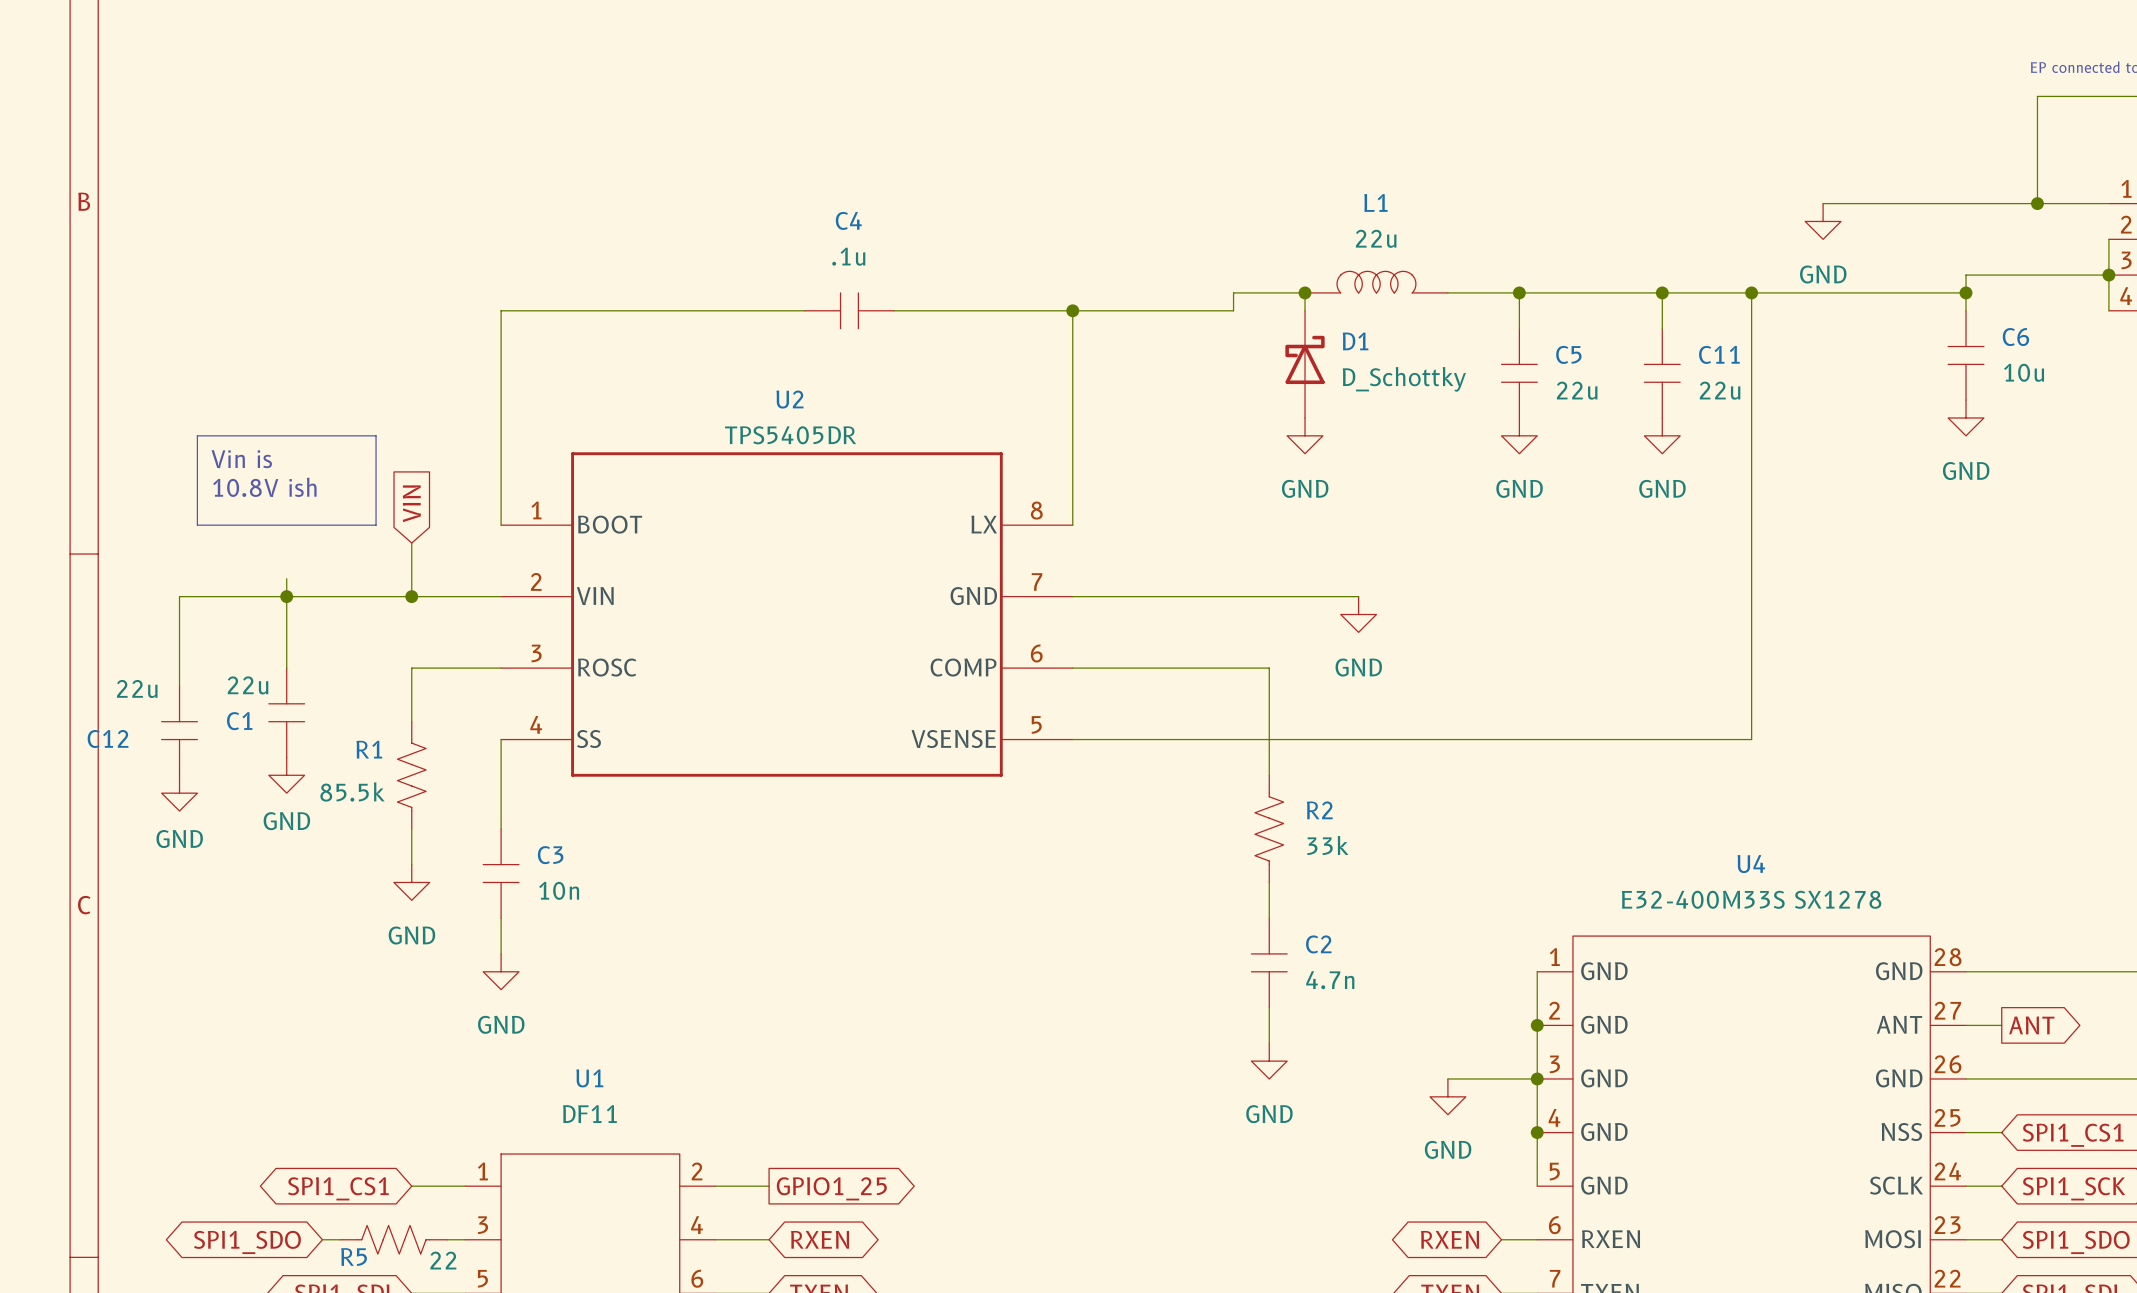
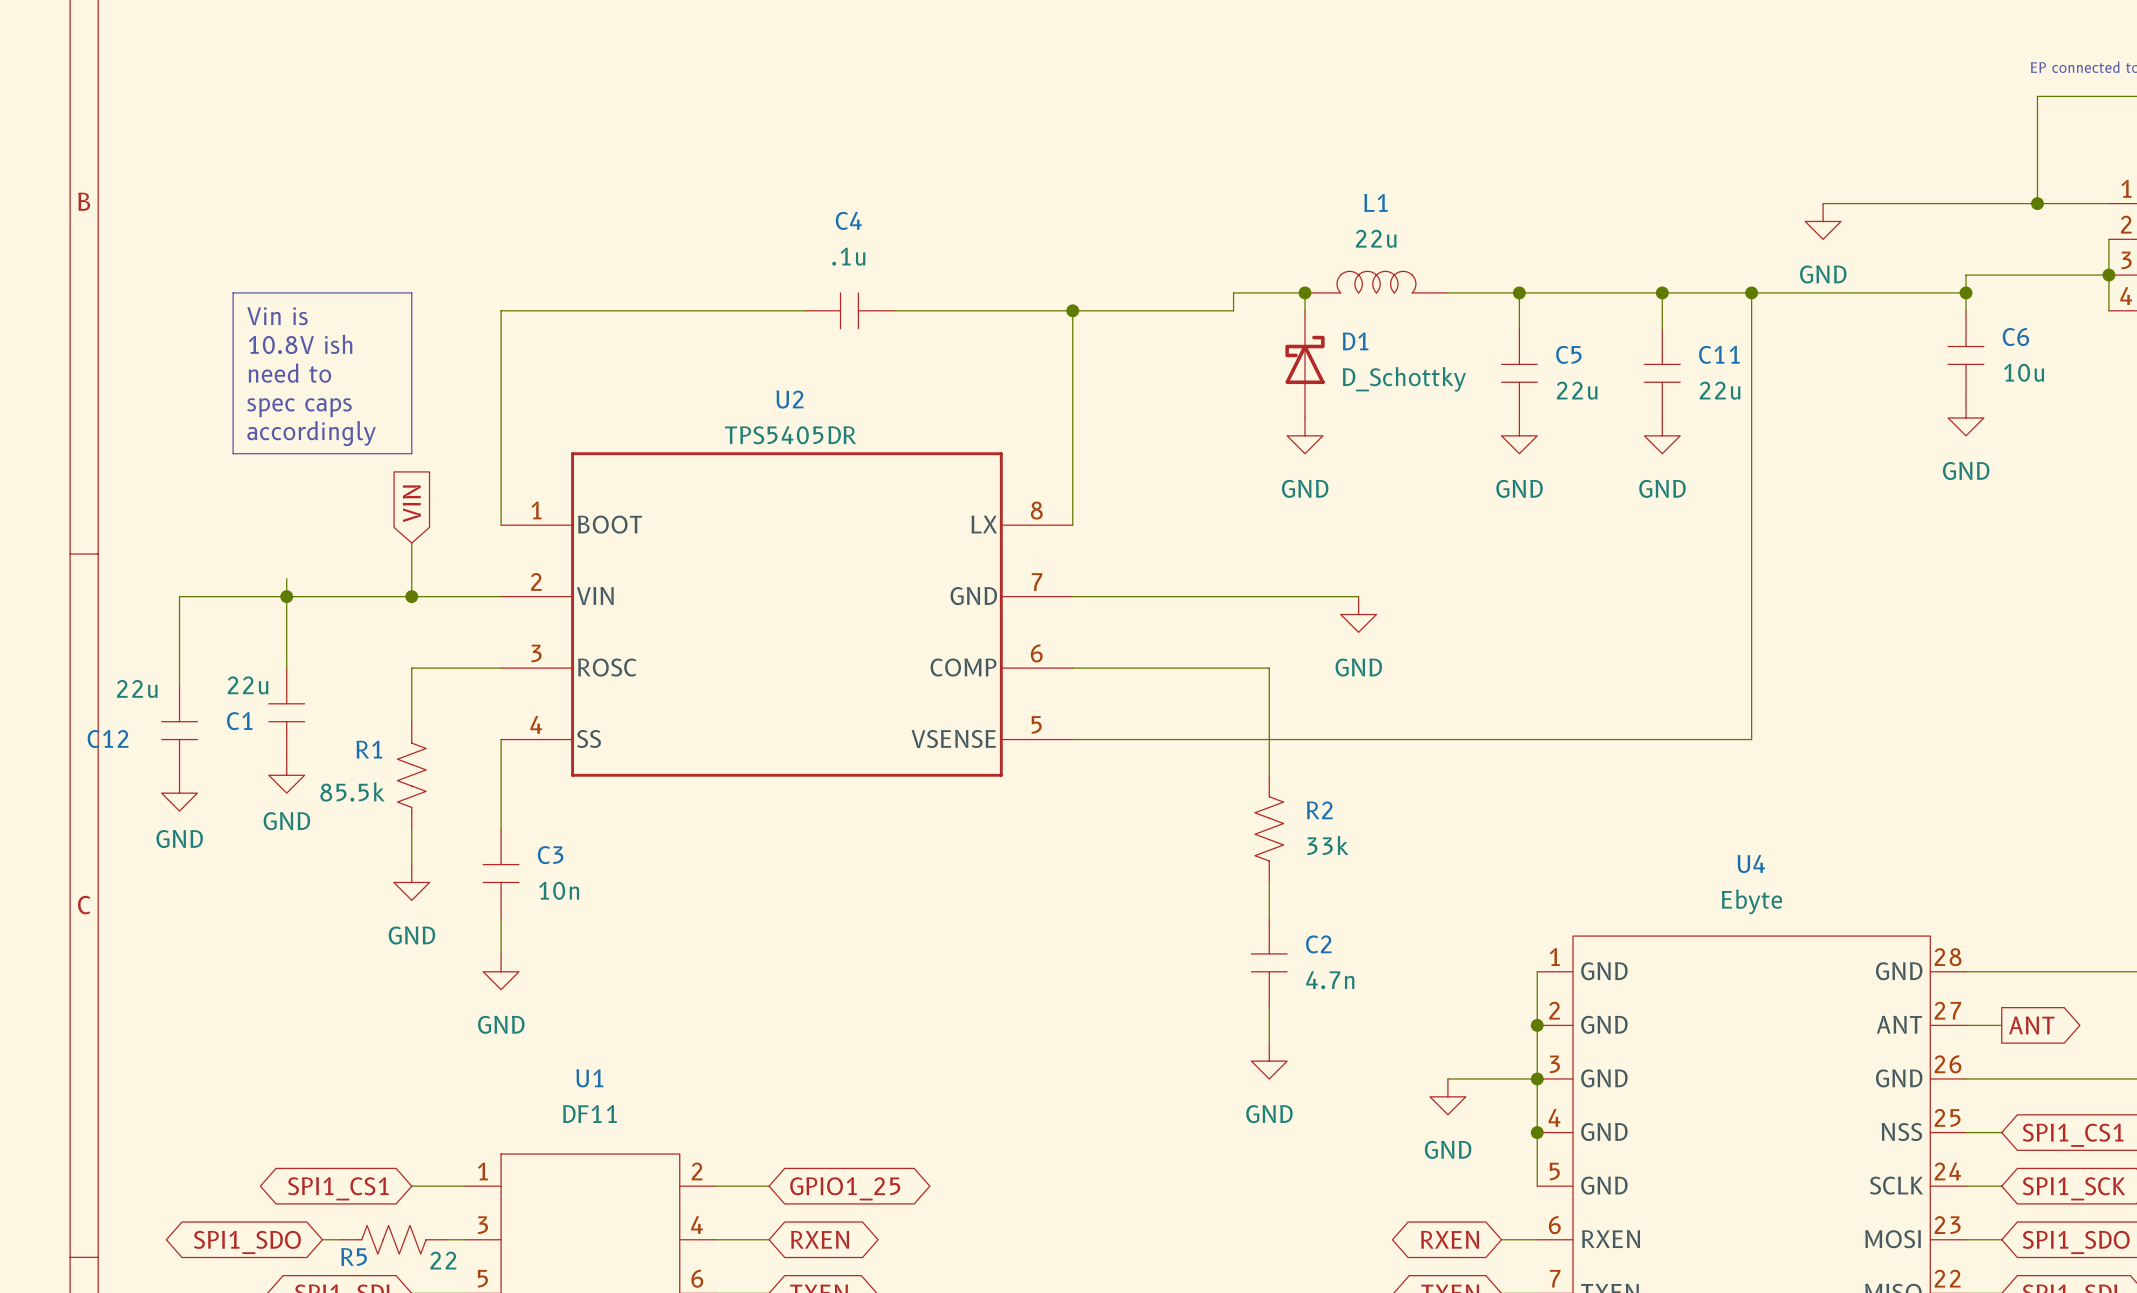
line: none -> (233, 292) (411, 292) (411, 453) (233, 453) (233, 292)
text: none -> need to (290, 373)
text: none -> spec caps (299, 407)
text: none -> accordingly (311, 433)
line: (197, 435) (376, 435) (376, 525) (197, 525) (197, 435) -> none
text position: Vin is (241, 459) -> Vin is (277, 316)
text position: 10.8V ish (264, 487) -> 10.8V ish (300, 344)
U4 value: E32-400M33S SX1278 (1751, 899) -> Ebyte (1751, 901)
global label shape: output (831, 1188) -> bidirectional (845, 1188)

